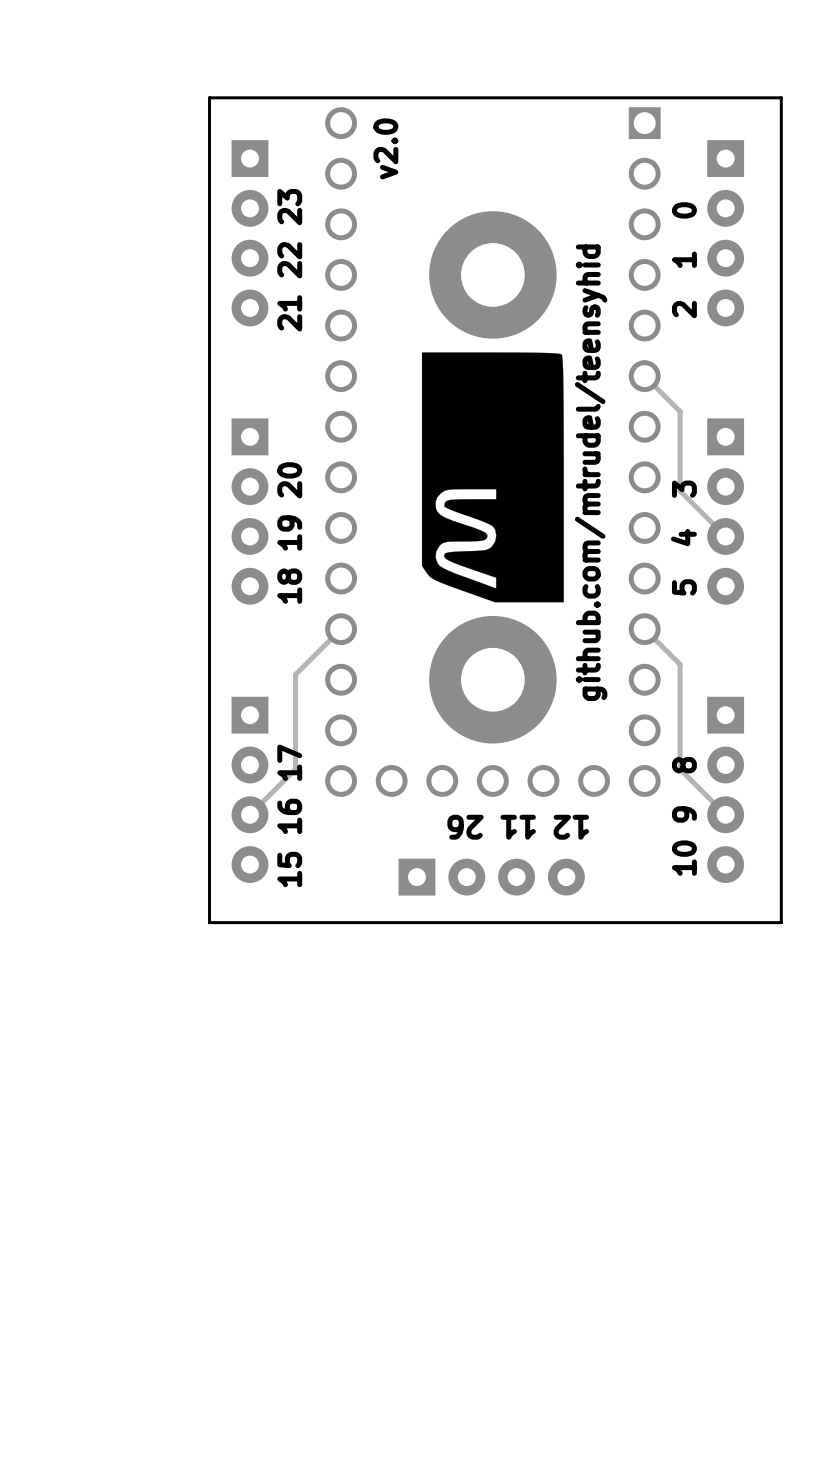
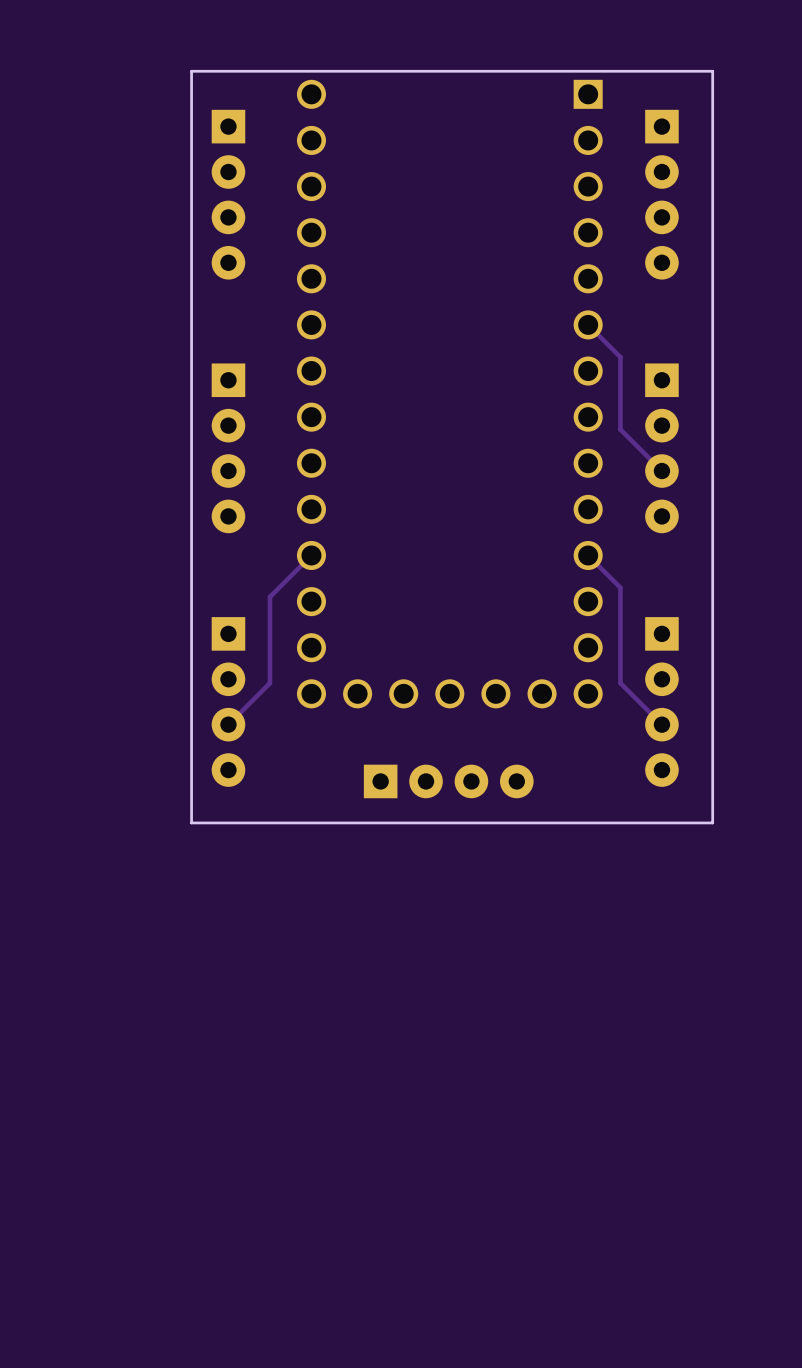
text: v2.0 (385, 148) -> none
text: 21 22 23 (289, 260) -> none
text: 2 1 0 (684, 260) -> none
part: (492, 274) -> none
drawing: [421, 352, 564, 603] -> none
text: github.com/mtrudel/teensyhid (591, 472) -> none
text: 18 19 20 (289, 533) -> none
text: 5 4 3 (683, 538) -> none
part: (492, 679) -> none
text: 15 16 17 (289, 815) -> none
text: 10 9 8 (684, 816) -> none
text: 12 11 26 (518, 827) -> none

